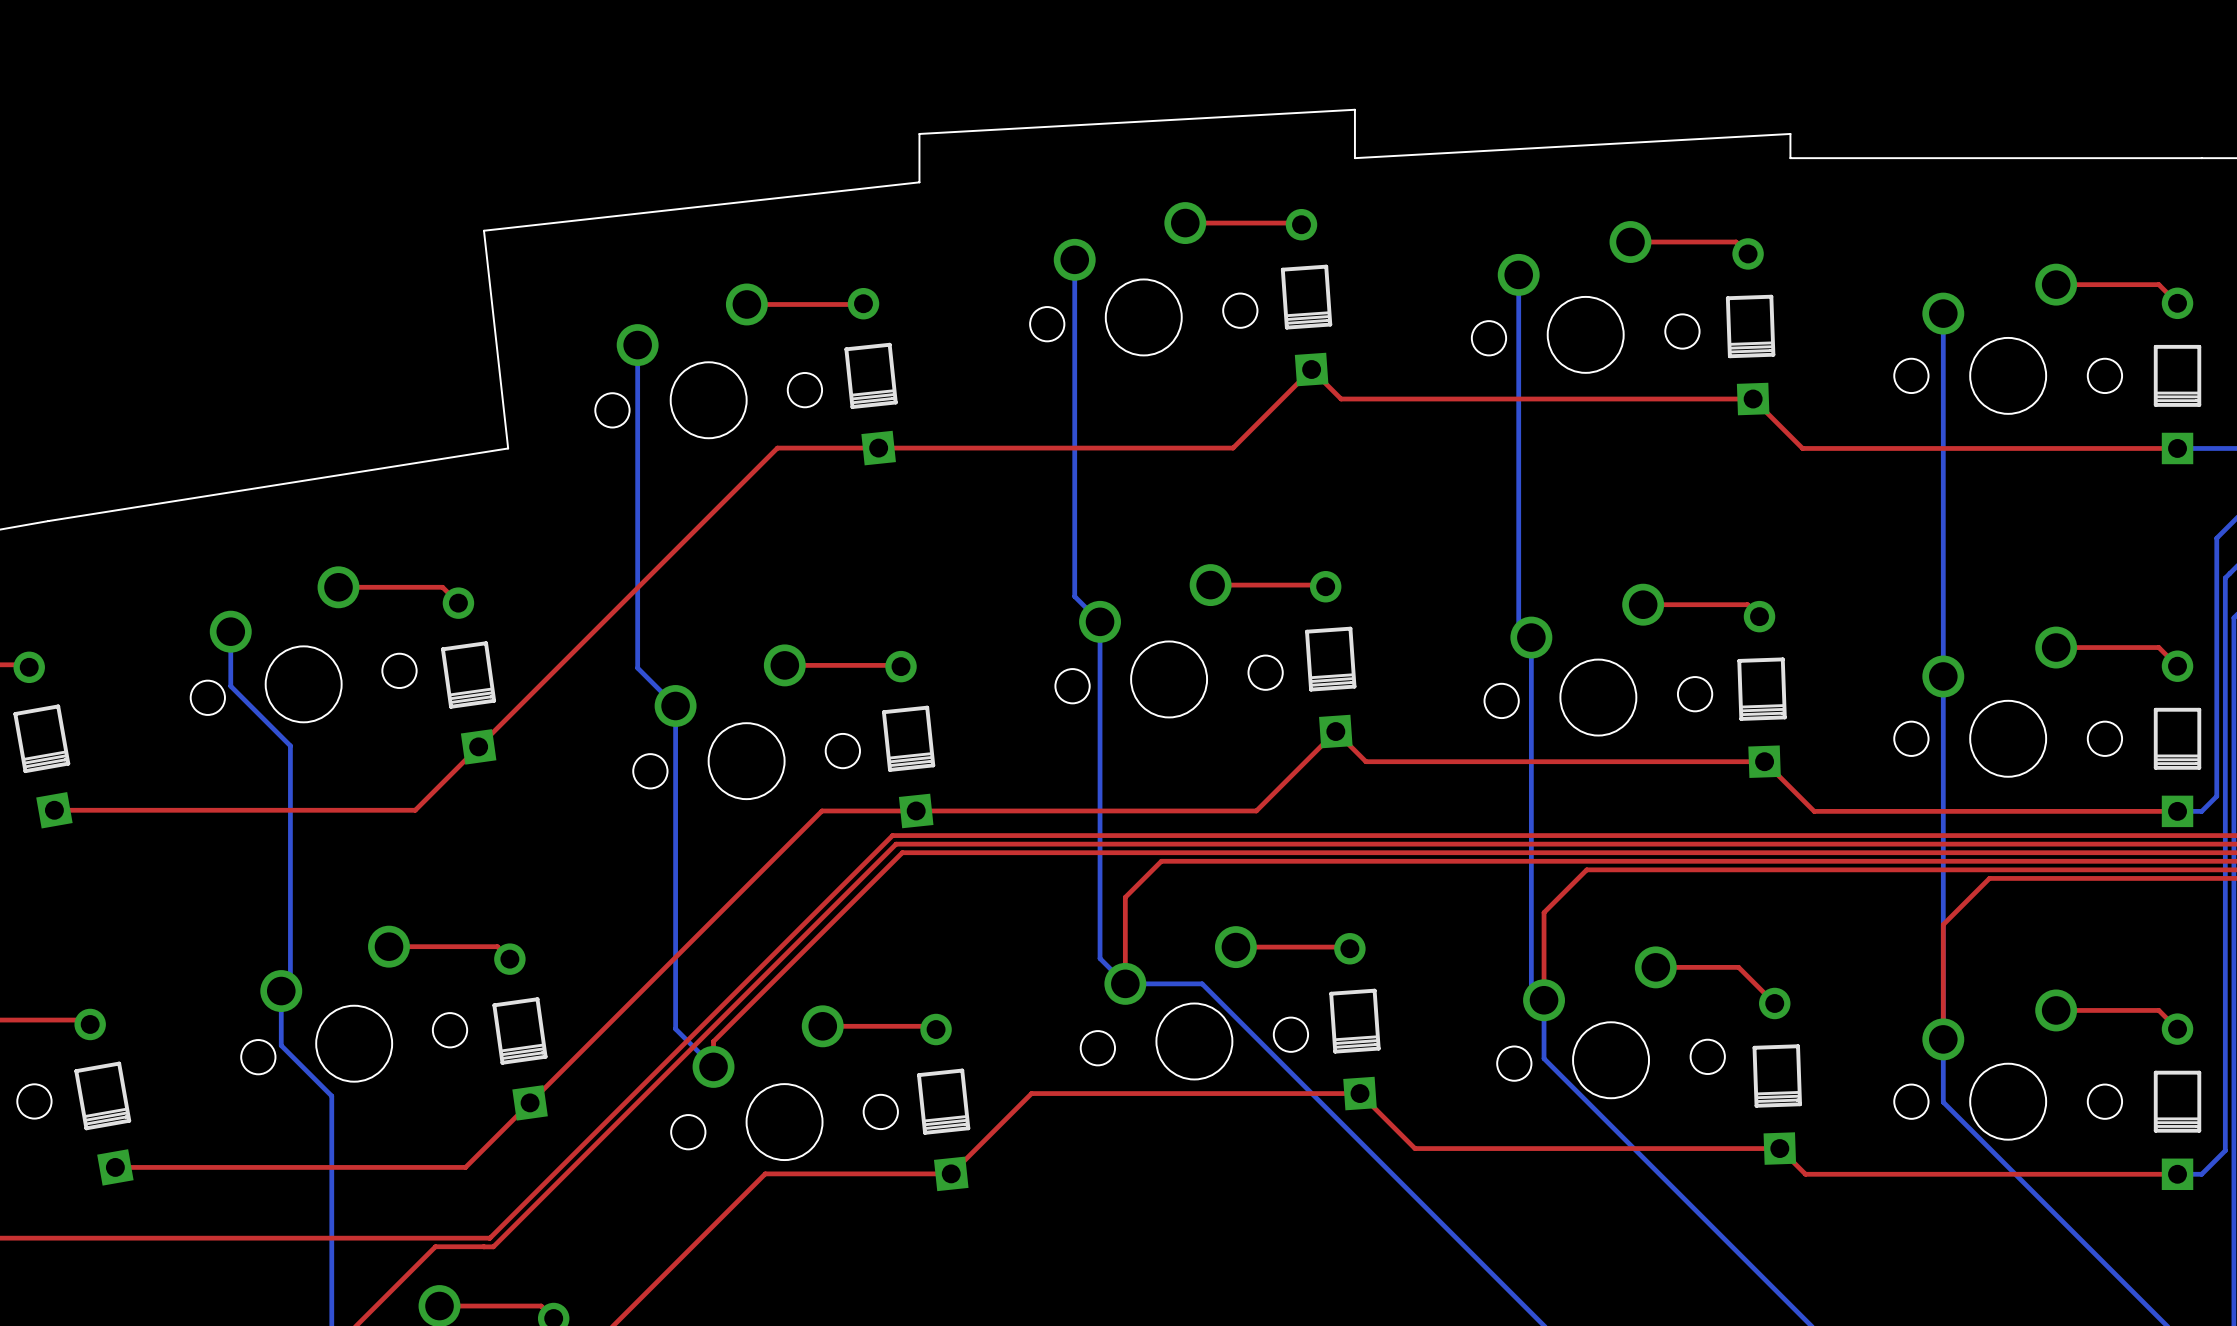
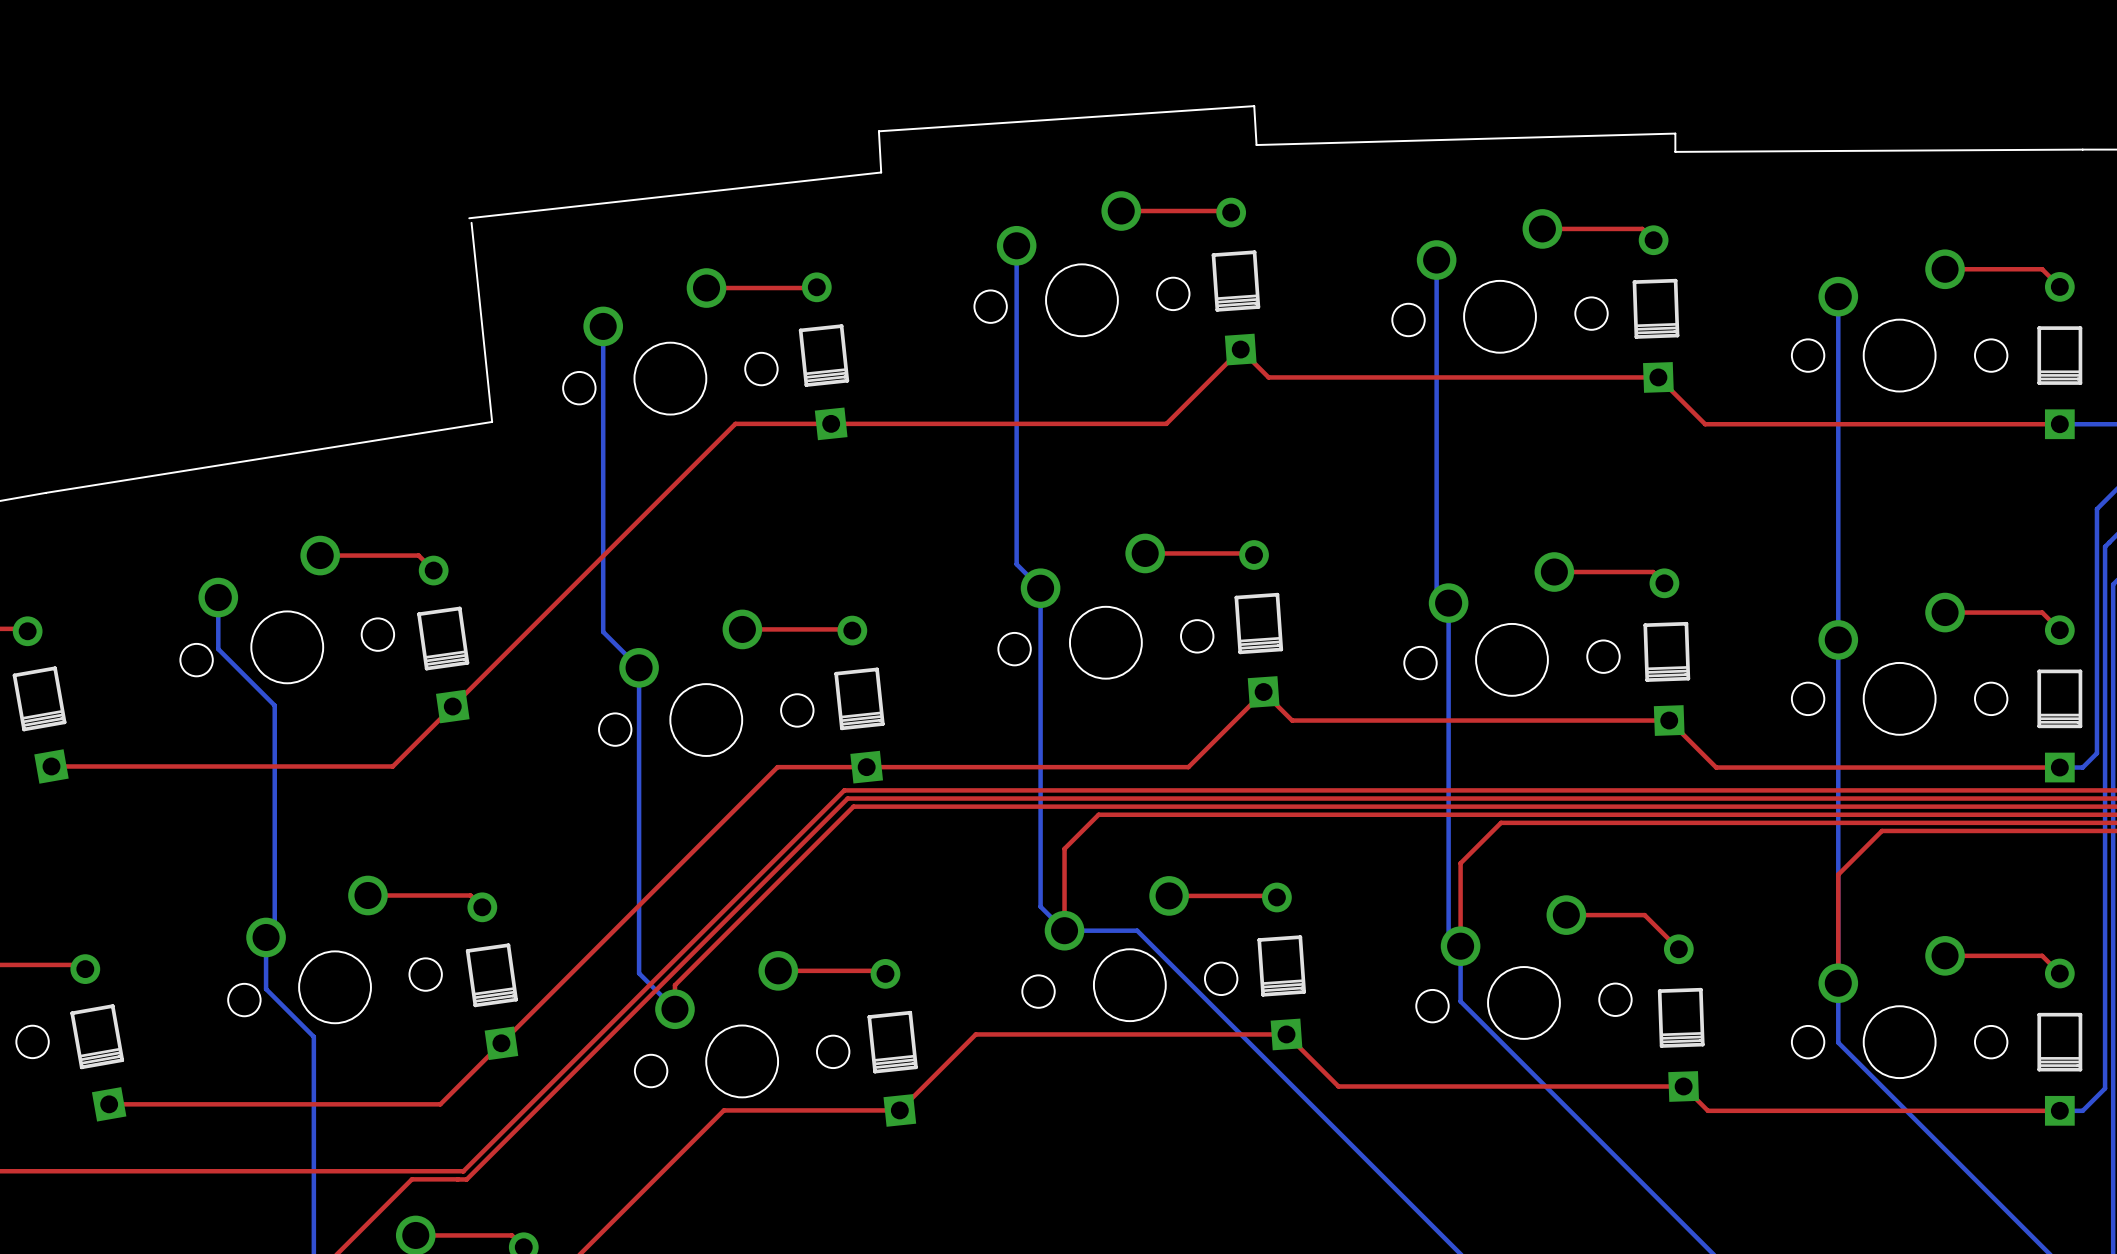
board edge: (2201, 158) (1790, 158) (1790, 133) (1354, 158) (1354, 109) (919, 133) (919, 182) (483, 230) (508, 448) (48, 521) -> (2082, 149) (1675, 151) (1675, 133) (1256, 145) (1254, 106) (878, 131) (881, 172) (469, 218)
board edge: none -> (471, 222) (492, 421) (45, 492)

